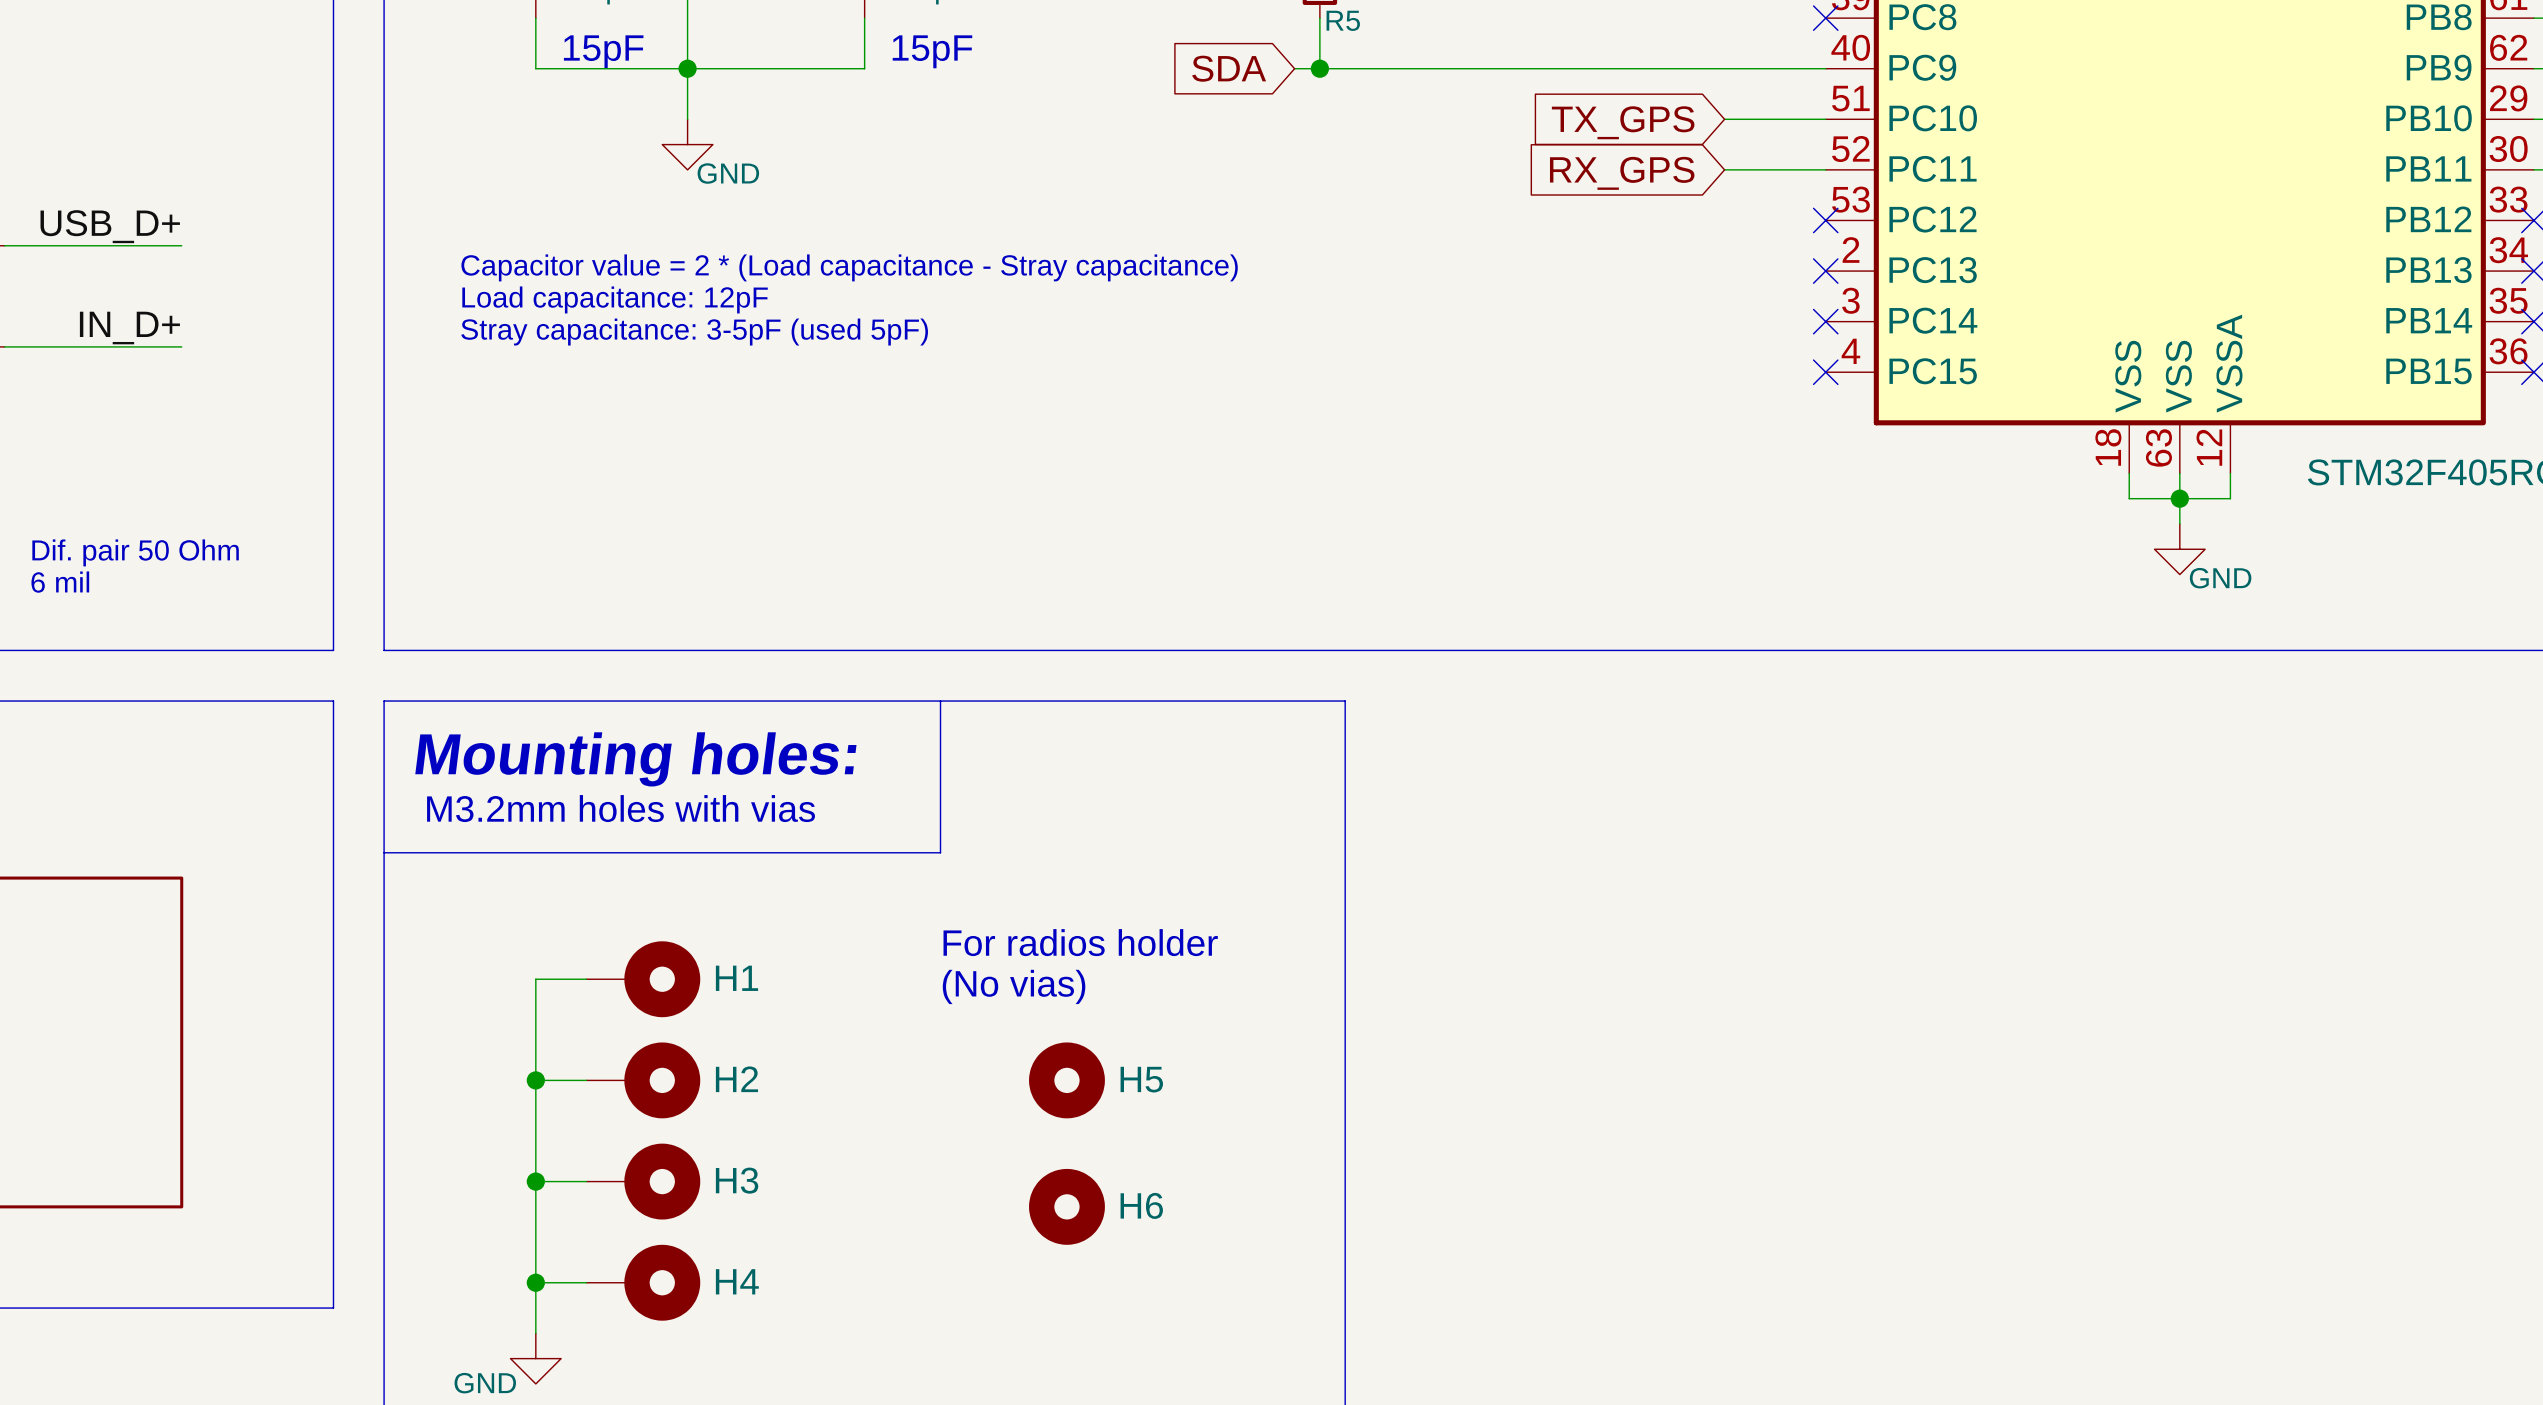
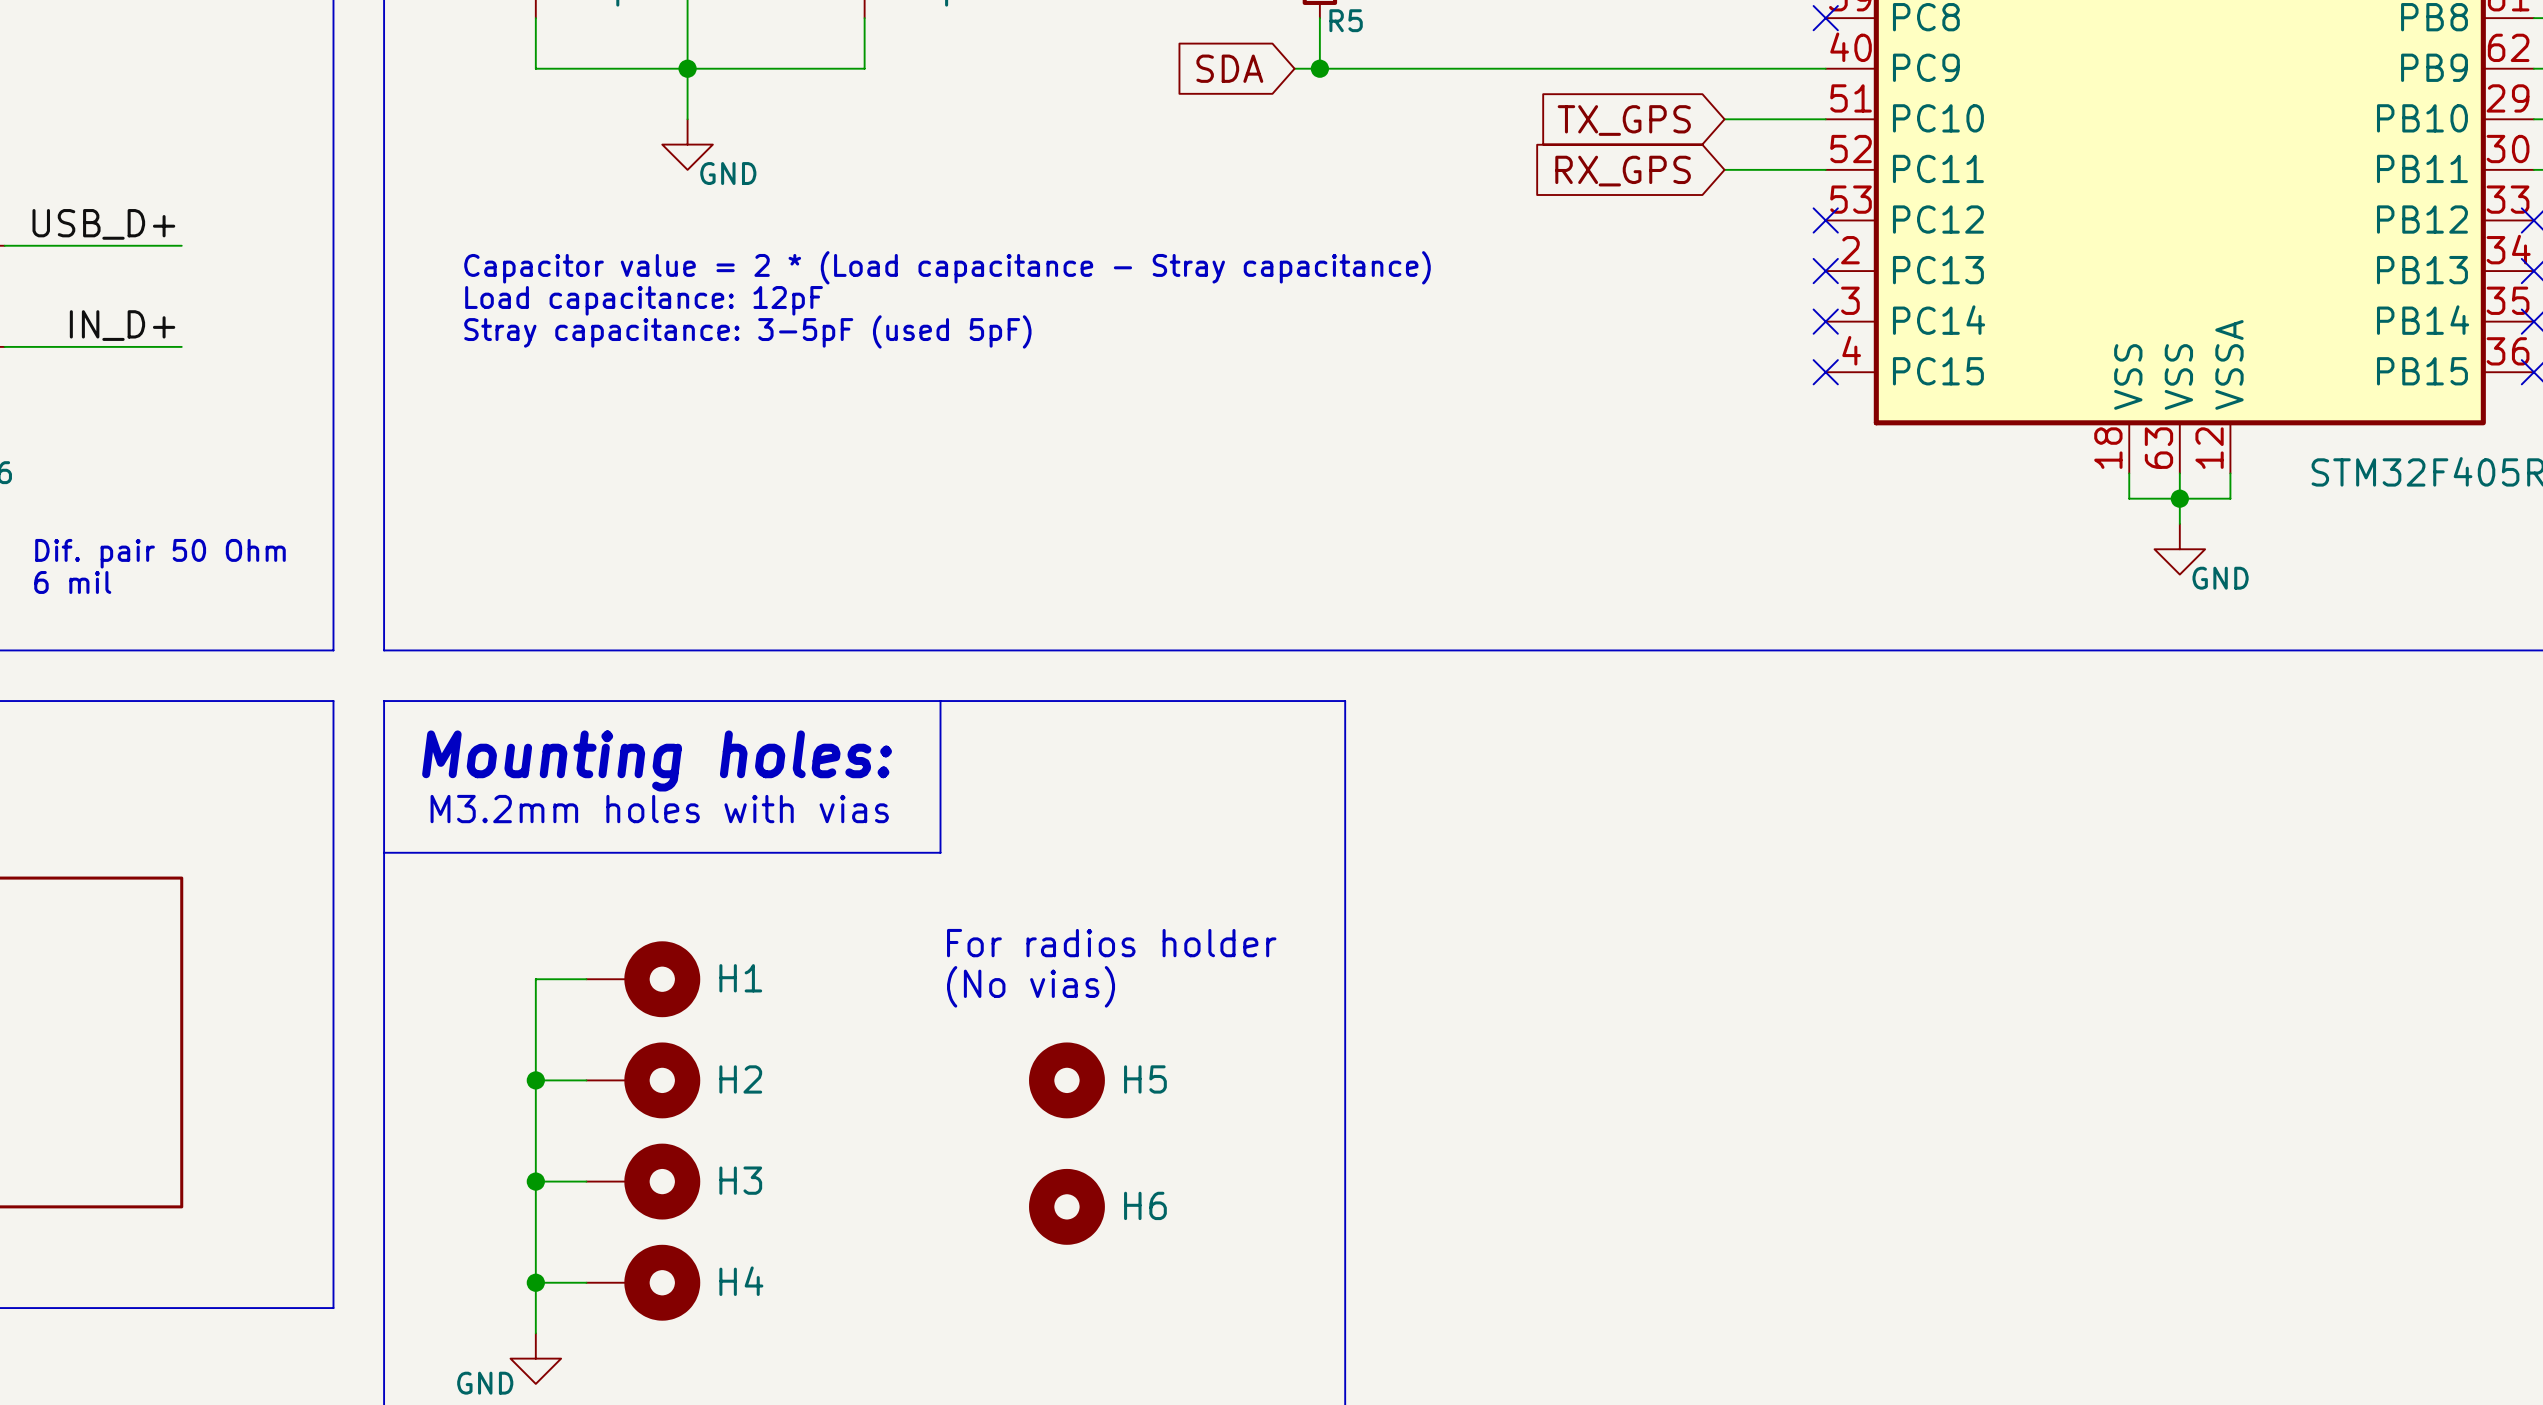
text: 15pF (603, 51) -> none
text: 15pF (932, 51) -> none

